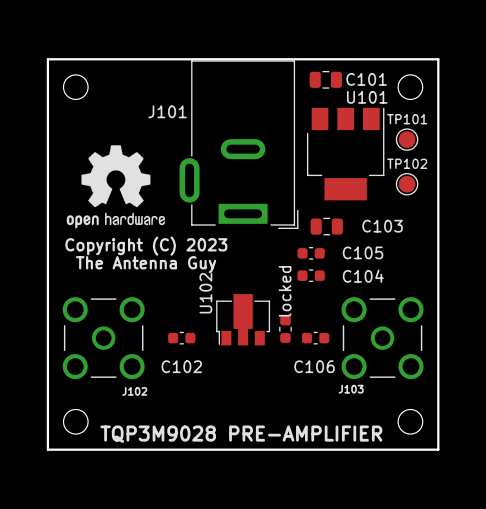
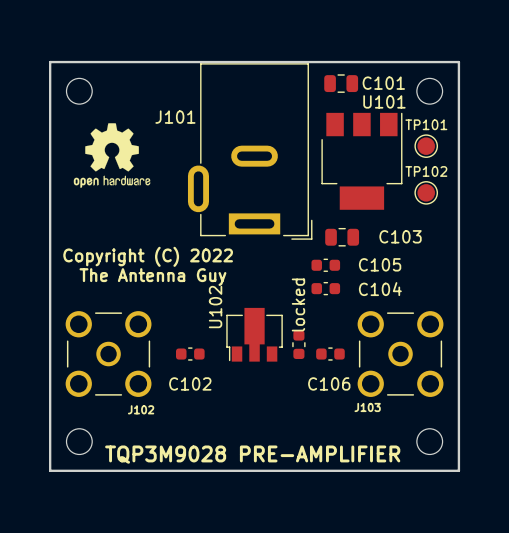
drawing: none -> [73, 123, 151, 188]
drawing: [66, 145, 166, 229] -> none
text: Copyright (C) 2023 (146, 246) -> Copyright (C) 2022 (148, 256)

